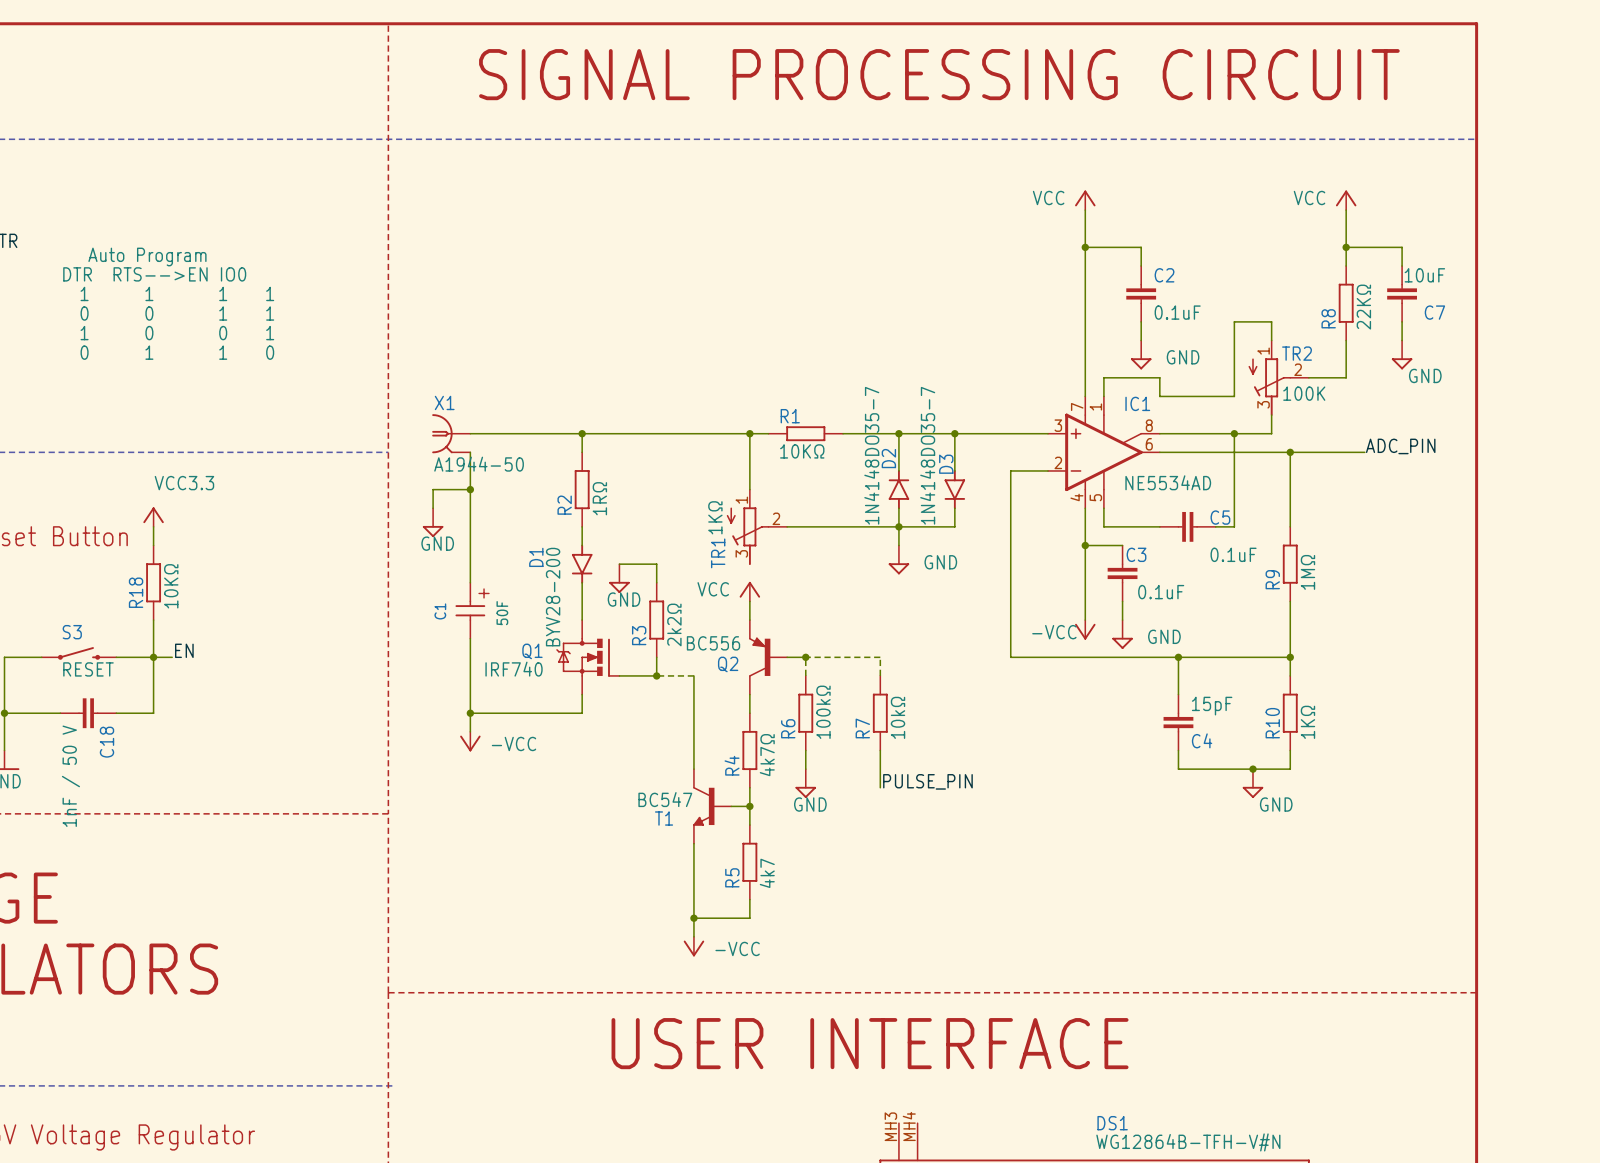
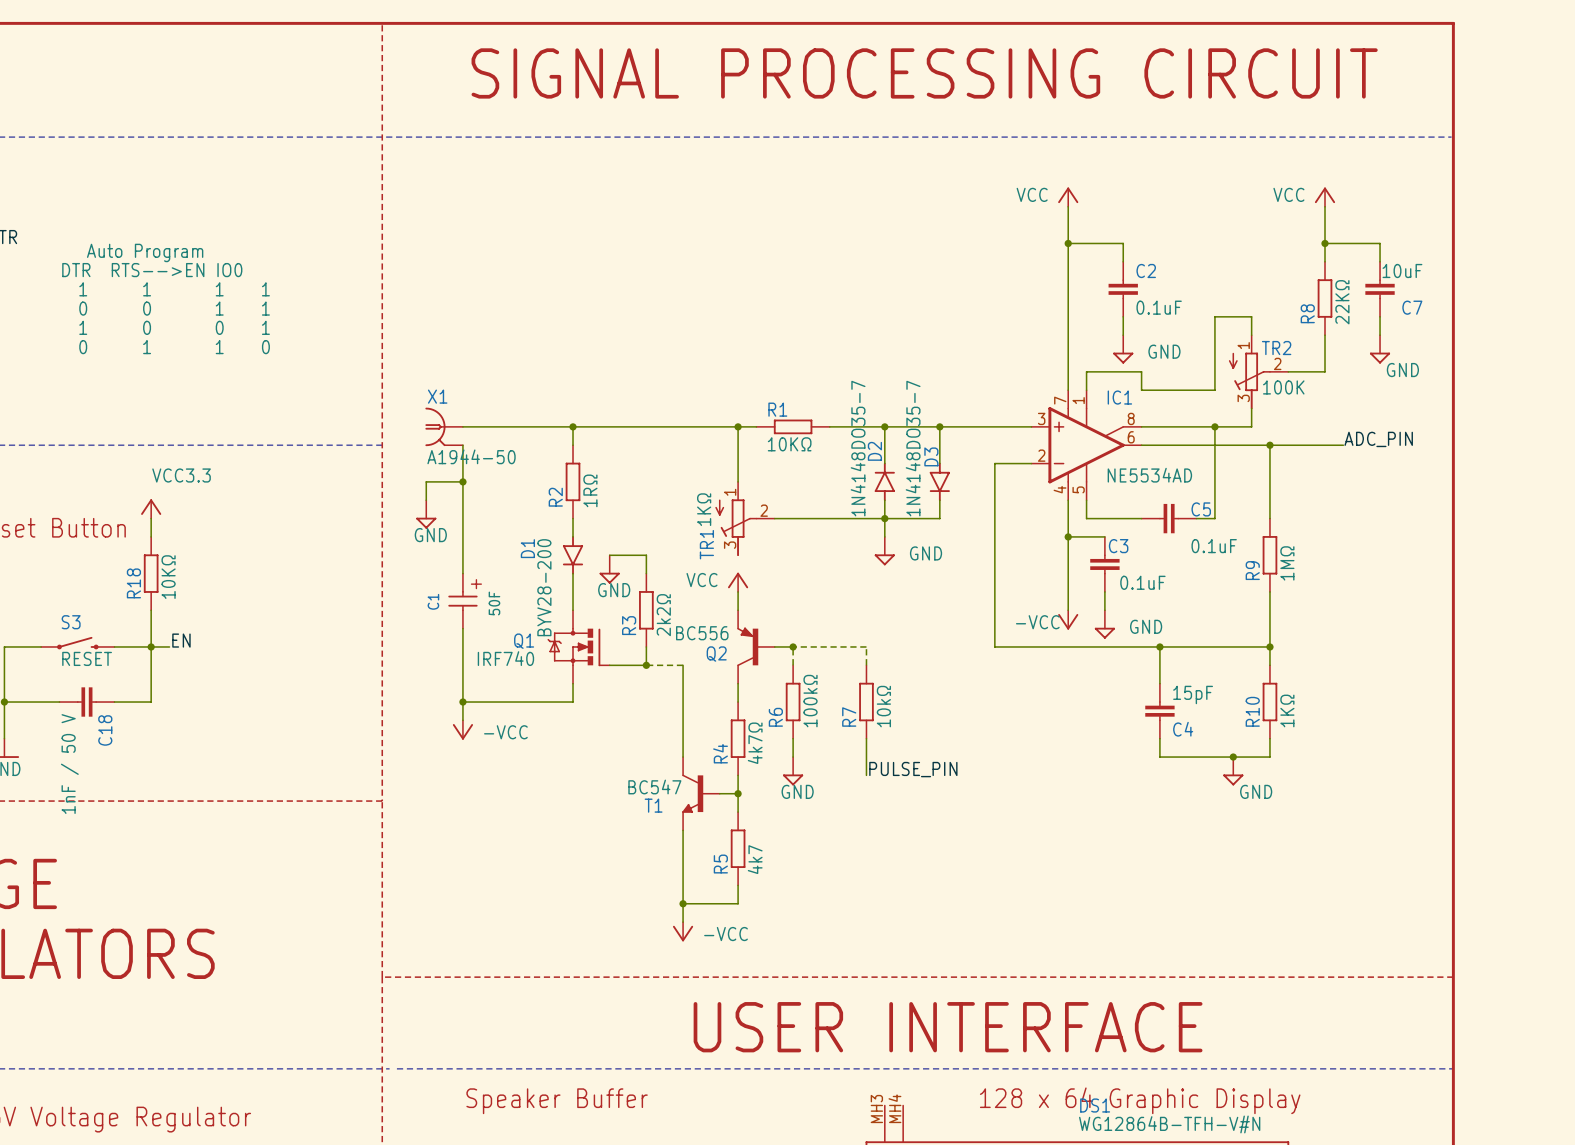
text position: USER INTERFACE (870, 1043) -> USER INTERFACE (948, 1027)
line: none -> (396, 1068) (1453, 1068)
text: none -> Speaker Buffer (557, 1101)
text: none -> 128 x 64 Graphic Display (1140, 1100)

